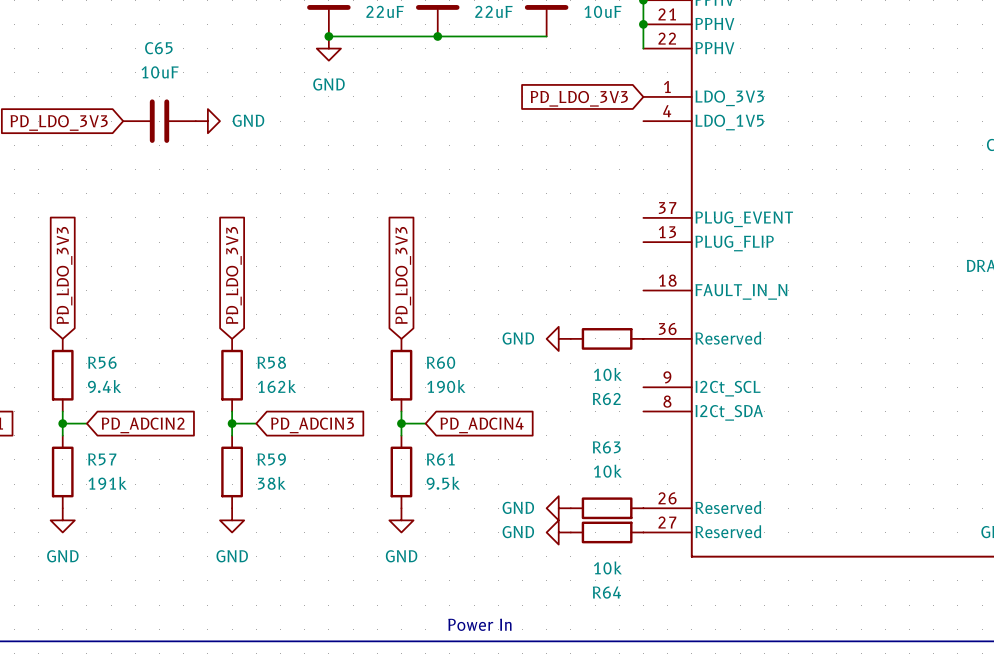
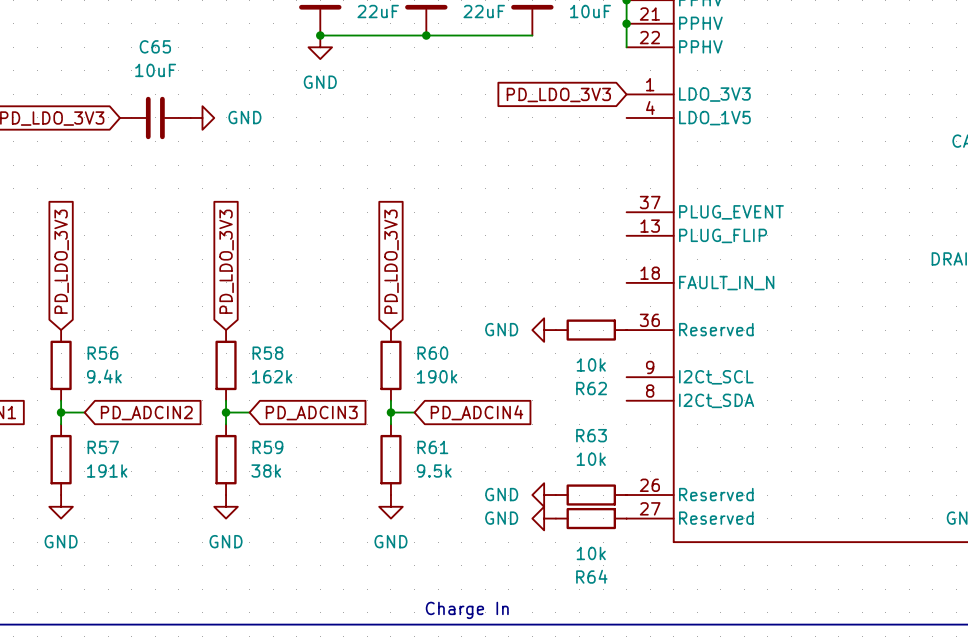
text: Power In (479, 624) -> Charge In (467, 610)

